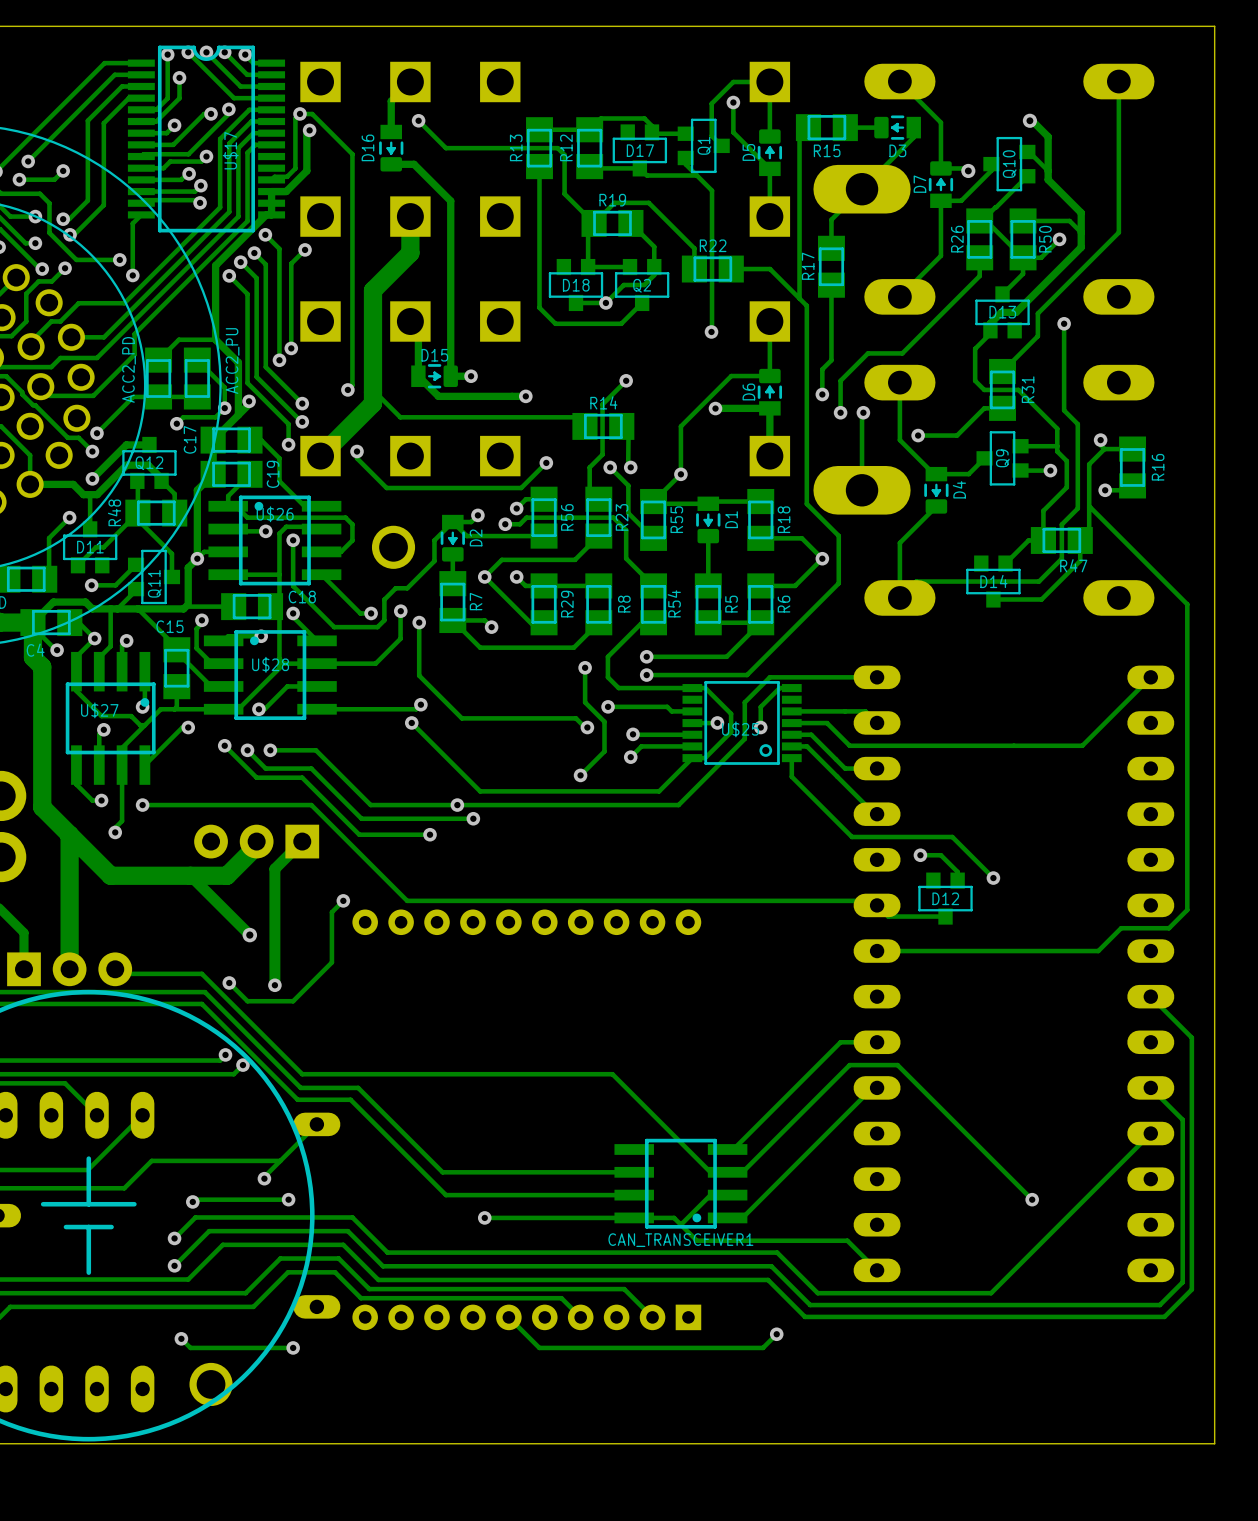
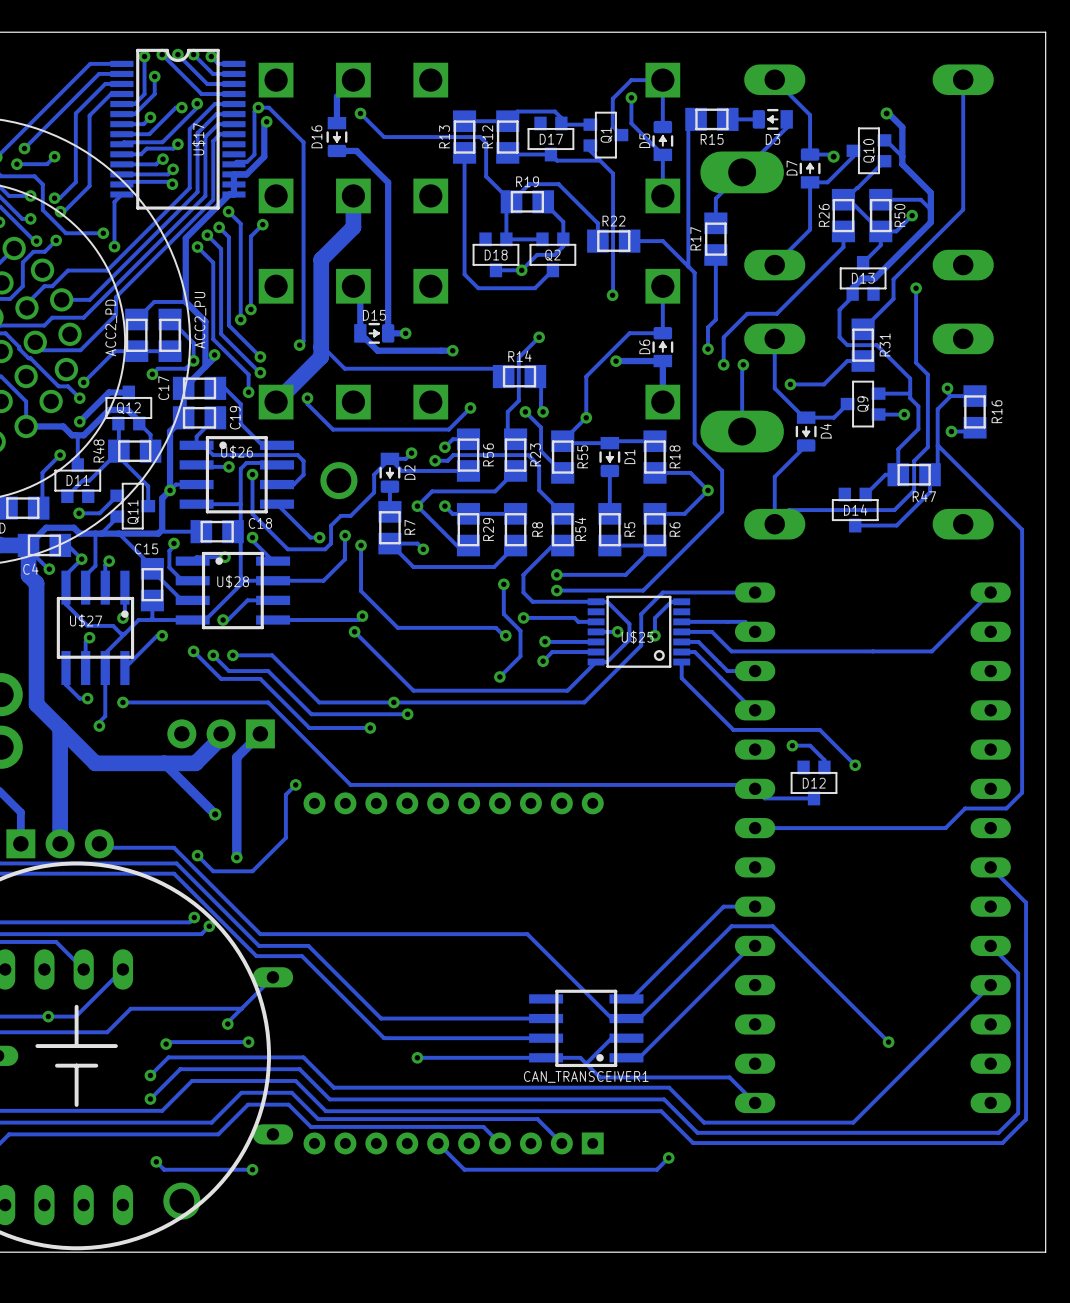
via: none -> (48, 1016)

